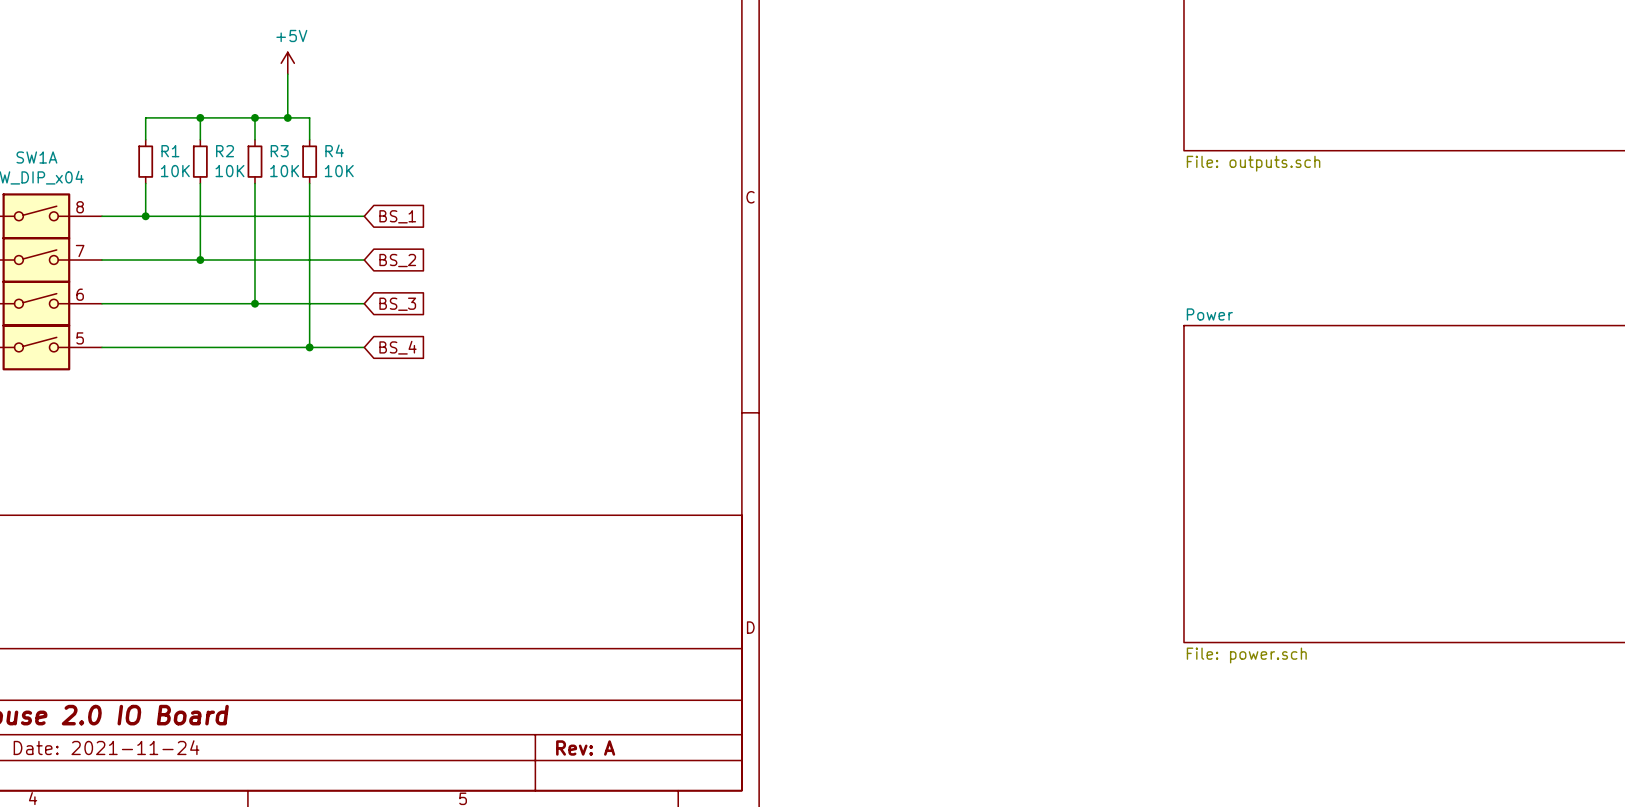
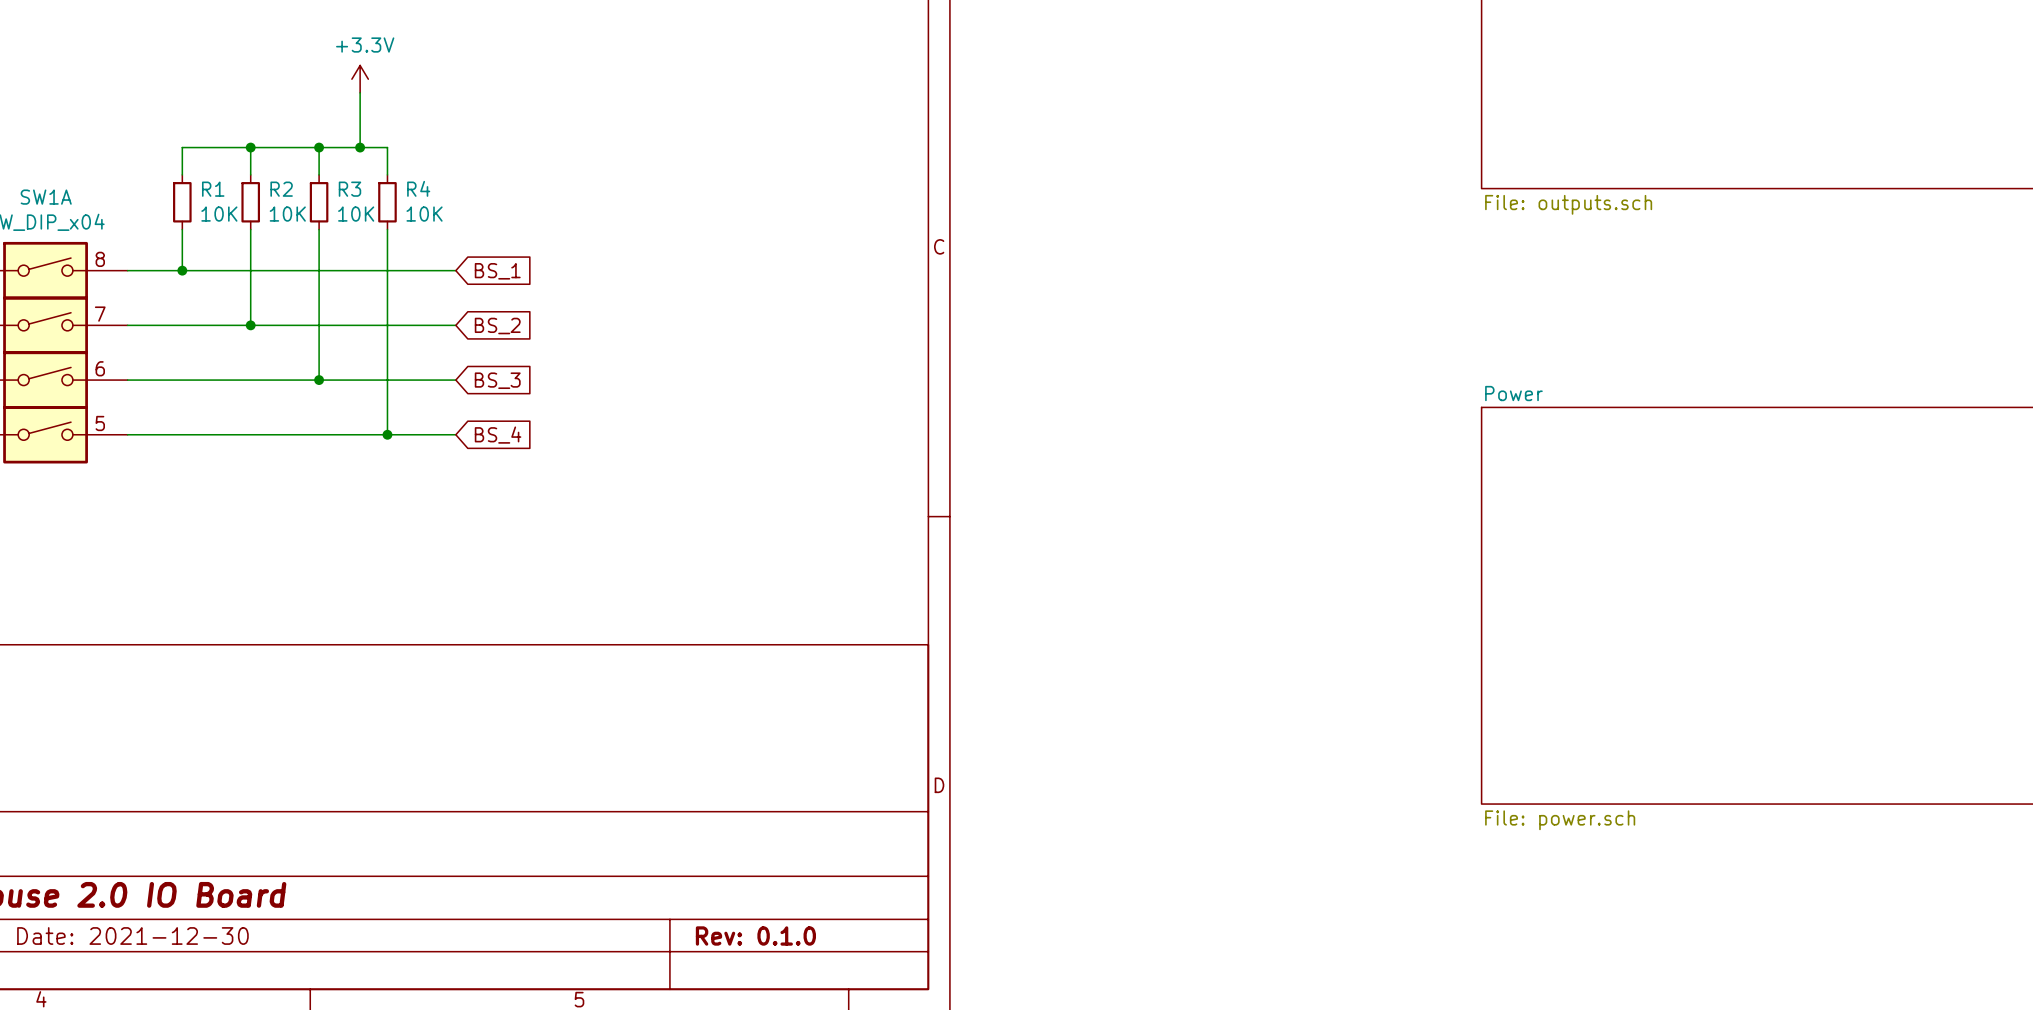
power symbol: +5V (287, 63) -> +3.3V (360, 79)
title block: Date: 2021-11-24 (106, 747) -> Date: 2021-12-30 (132, 935)
title block: Rev: A (585, 747) -> Rev: 0.1.0 (755, 935)

